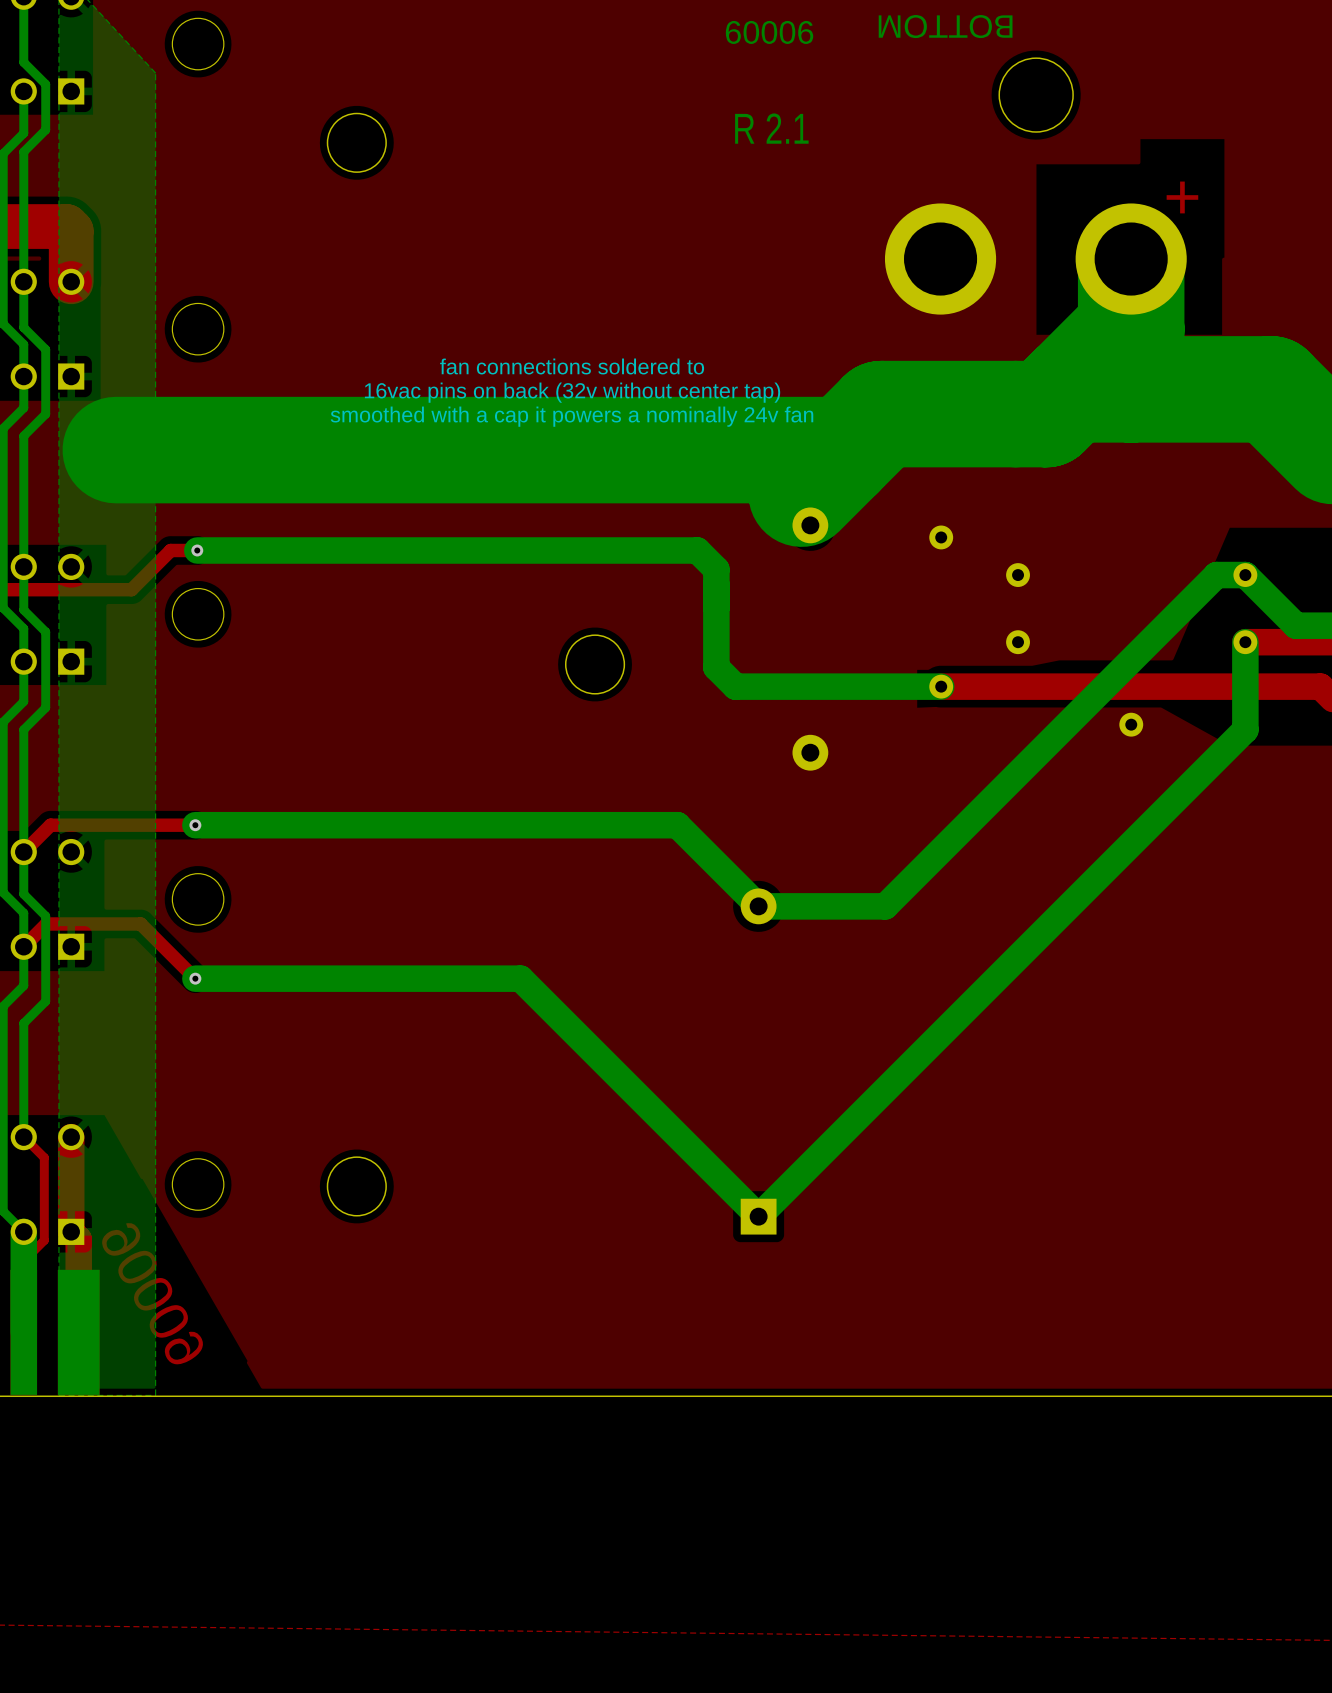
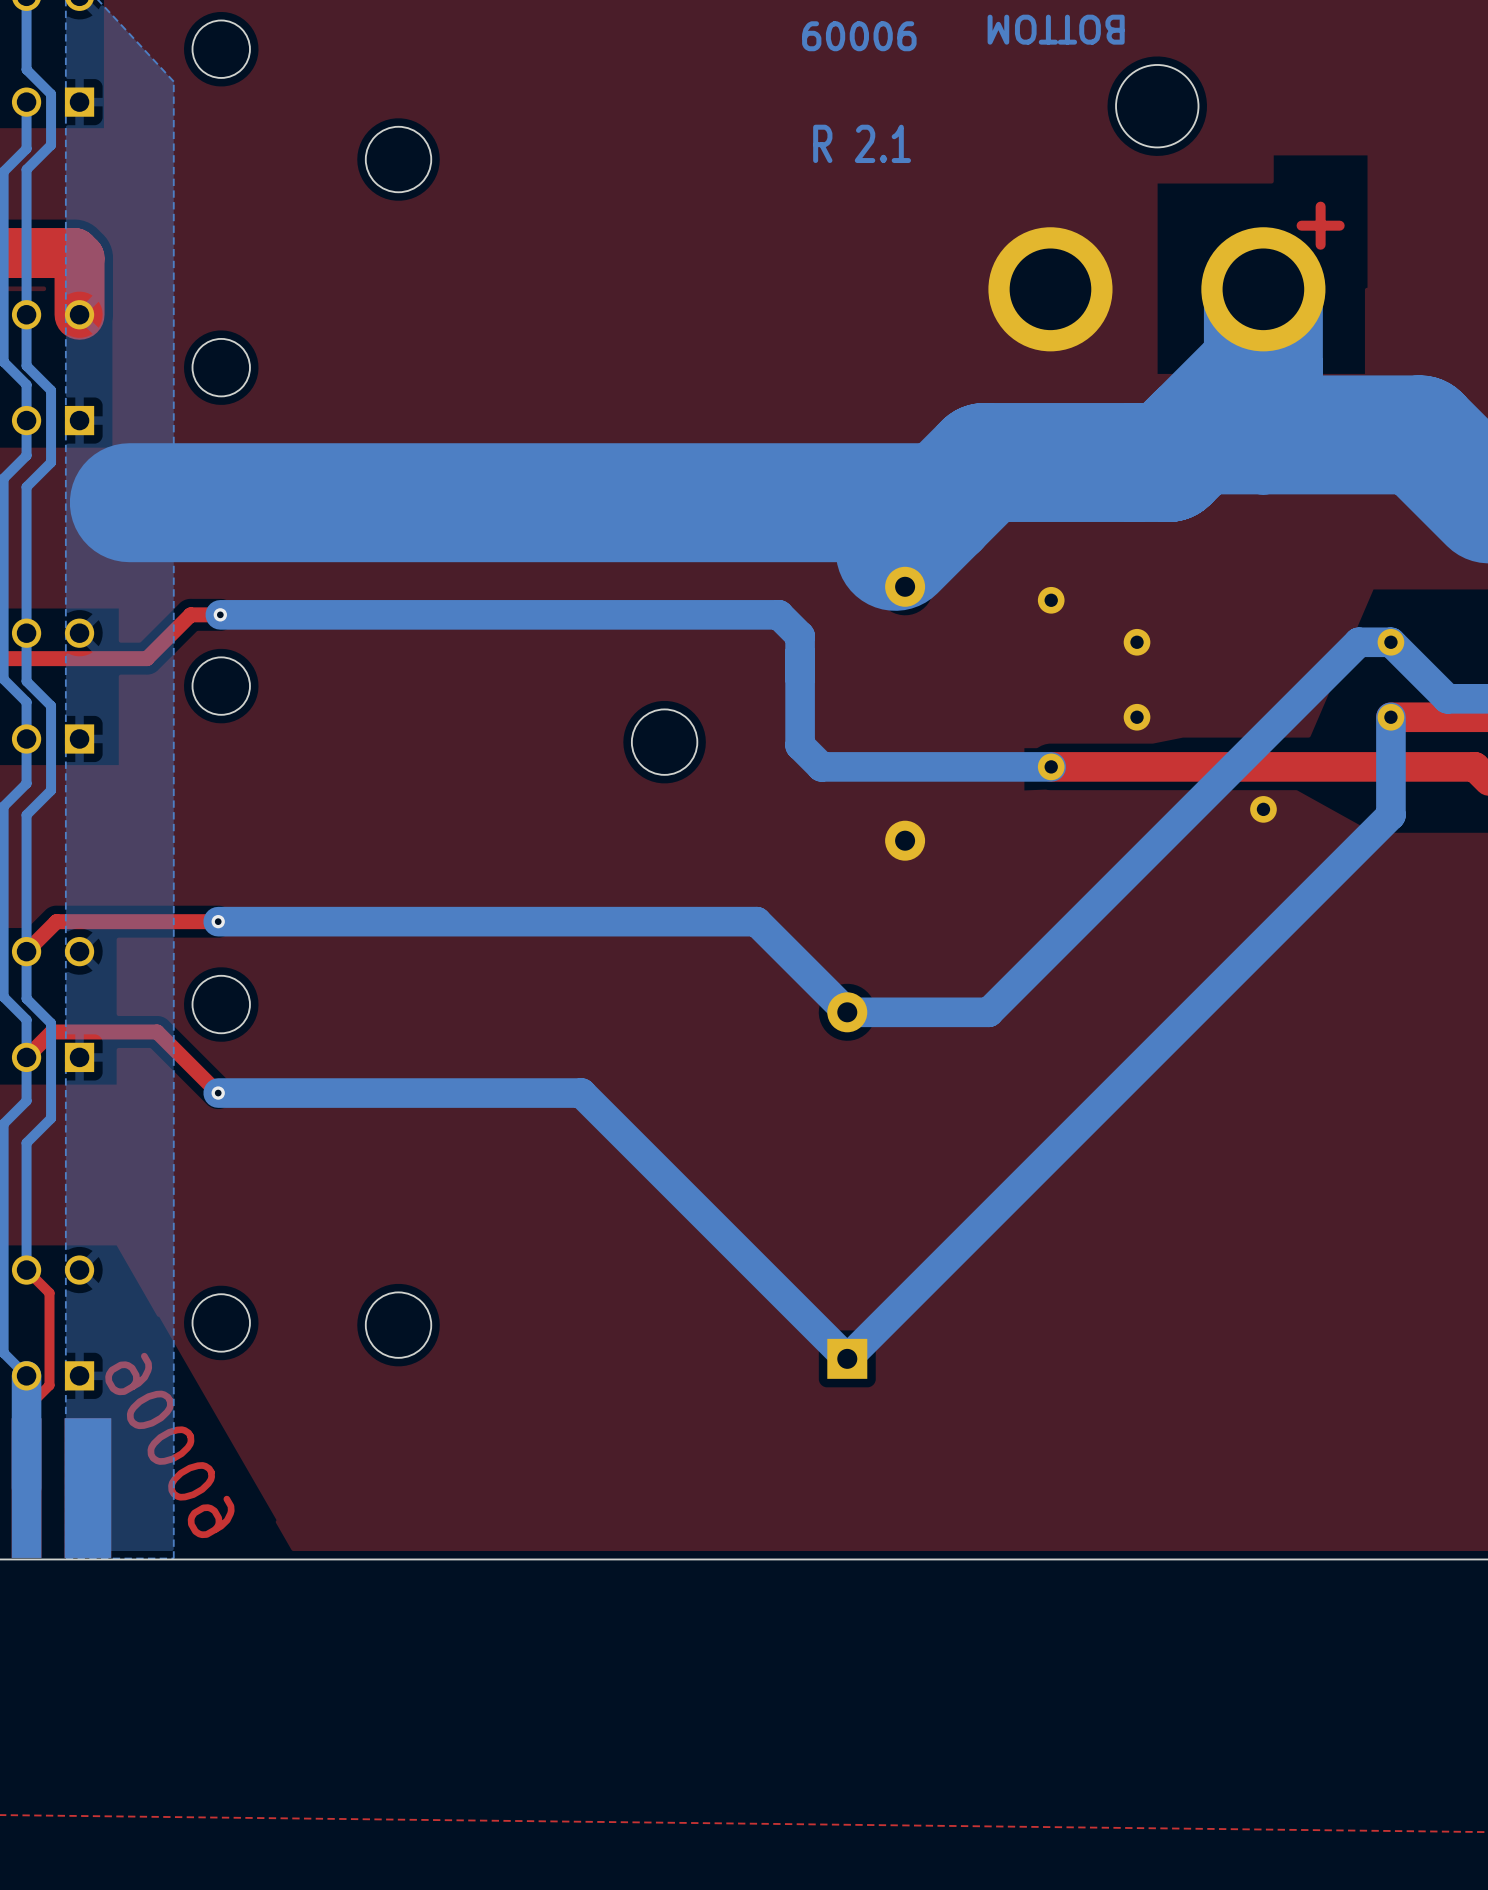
text: fan connections soldered to (572, 366) -> none
text: 16vac pins on back (32v without center tap) (572, 392) -> none
text: smoothed with a cap it powers a nominally 24v fan (571, 416) -> none
top track: (71, 1137) (71, 1231) (78, 1239) (78, 1332) -> none

